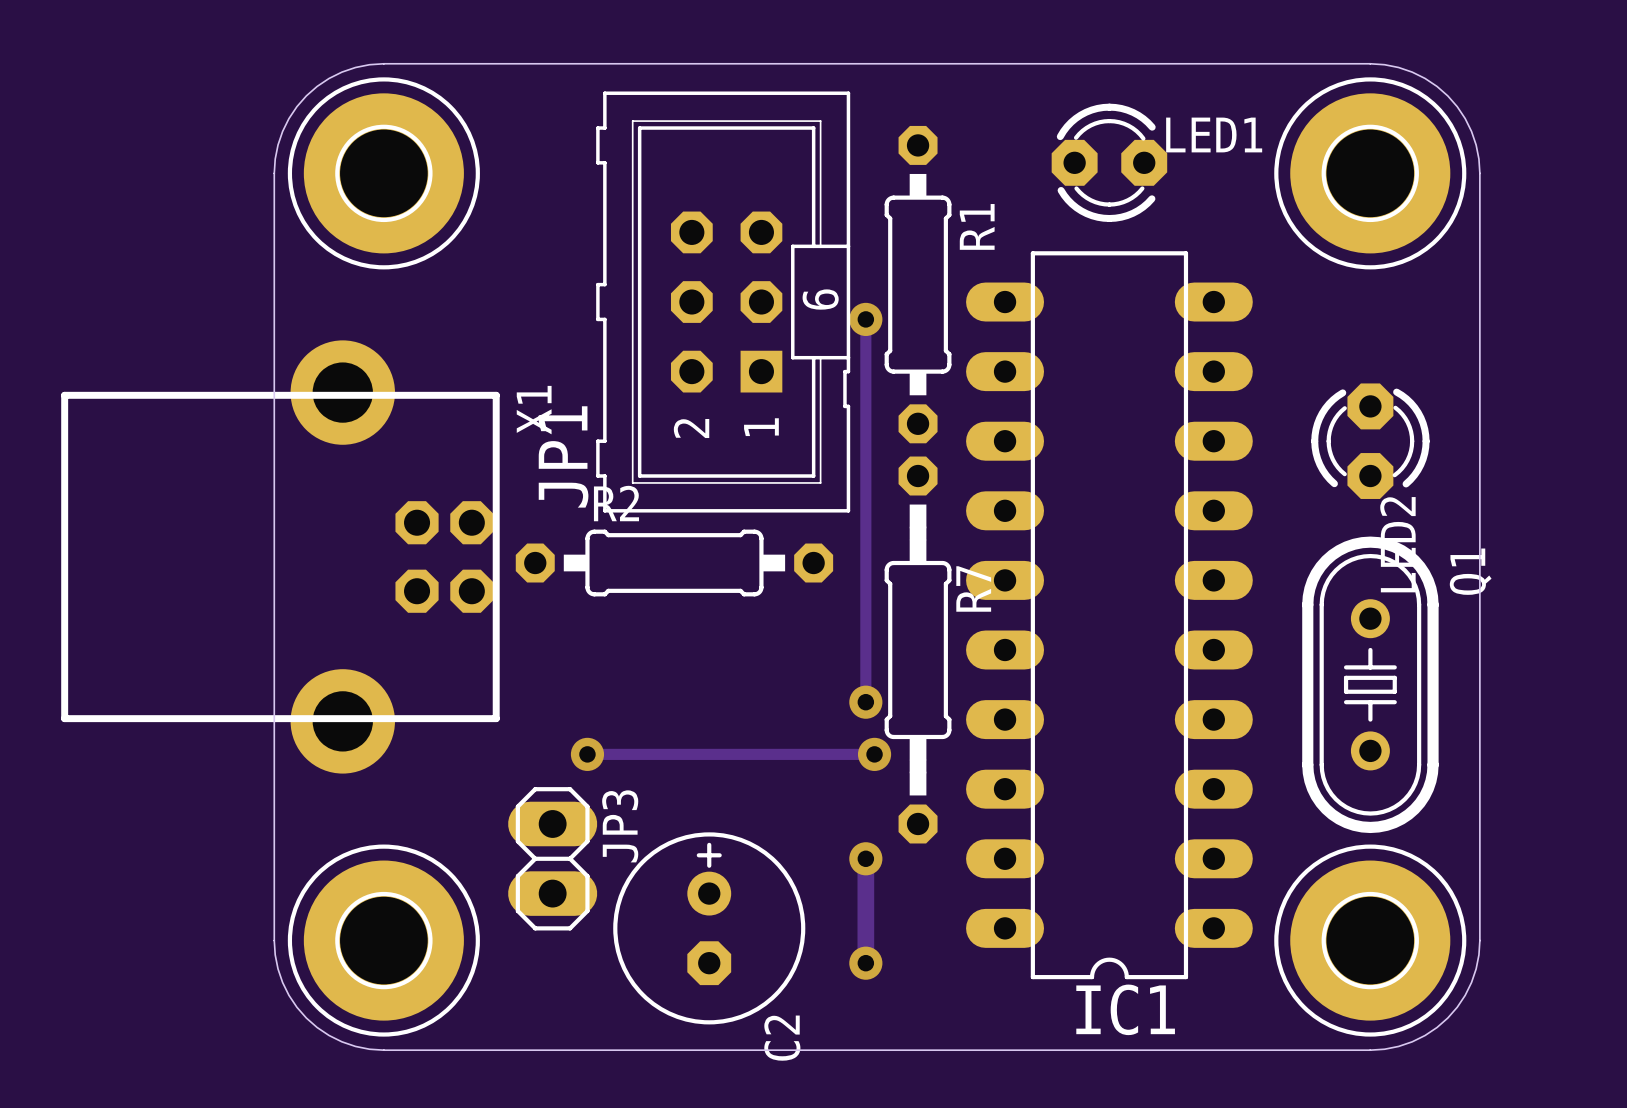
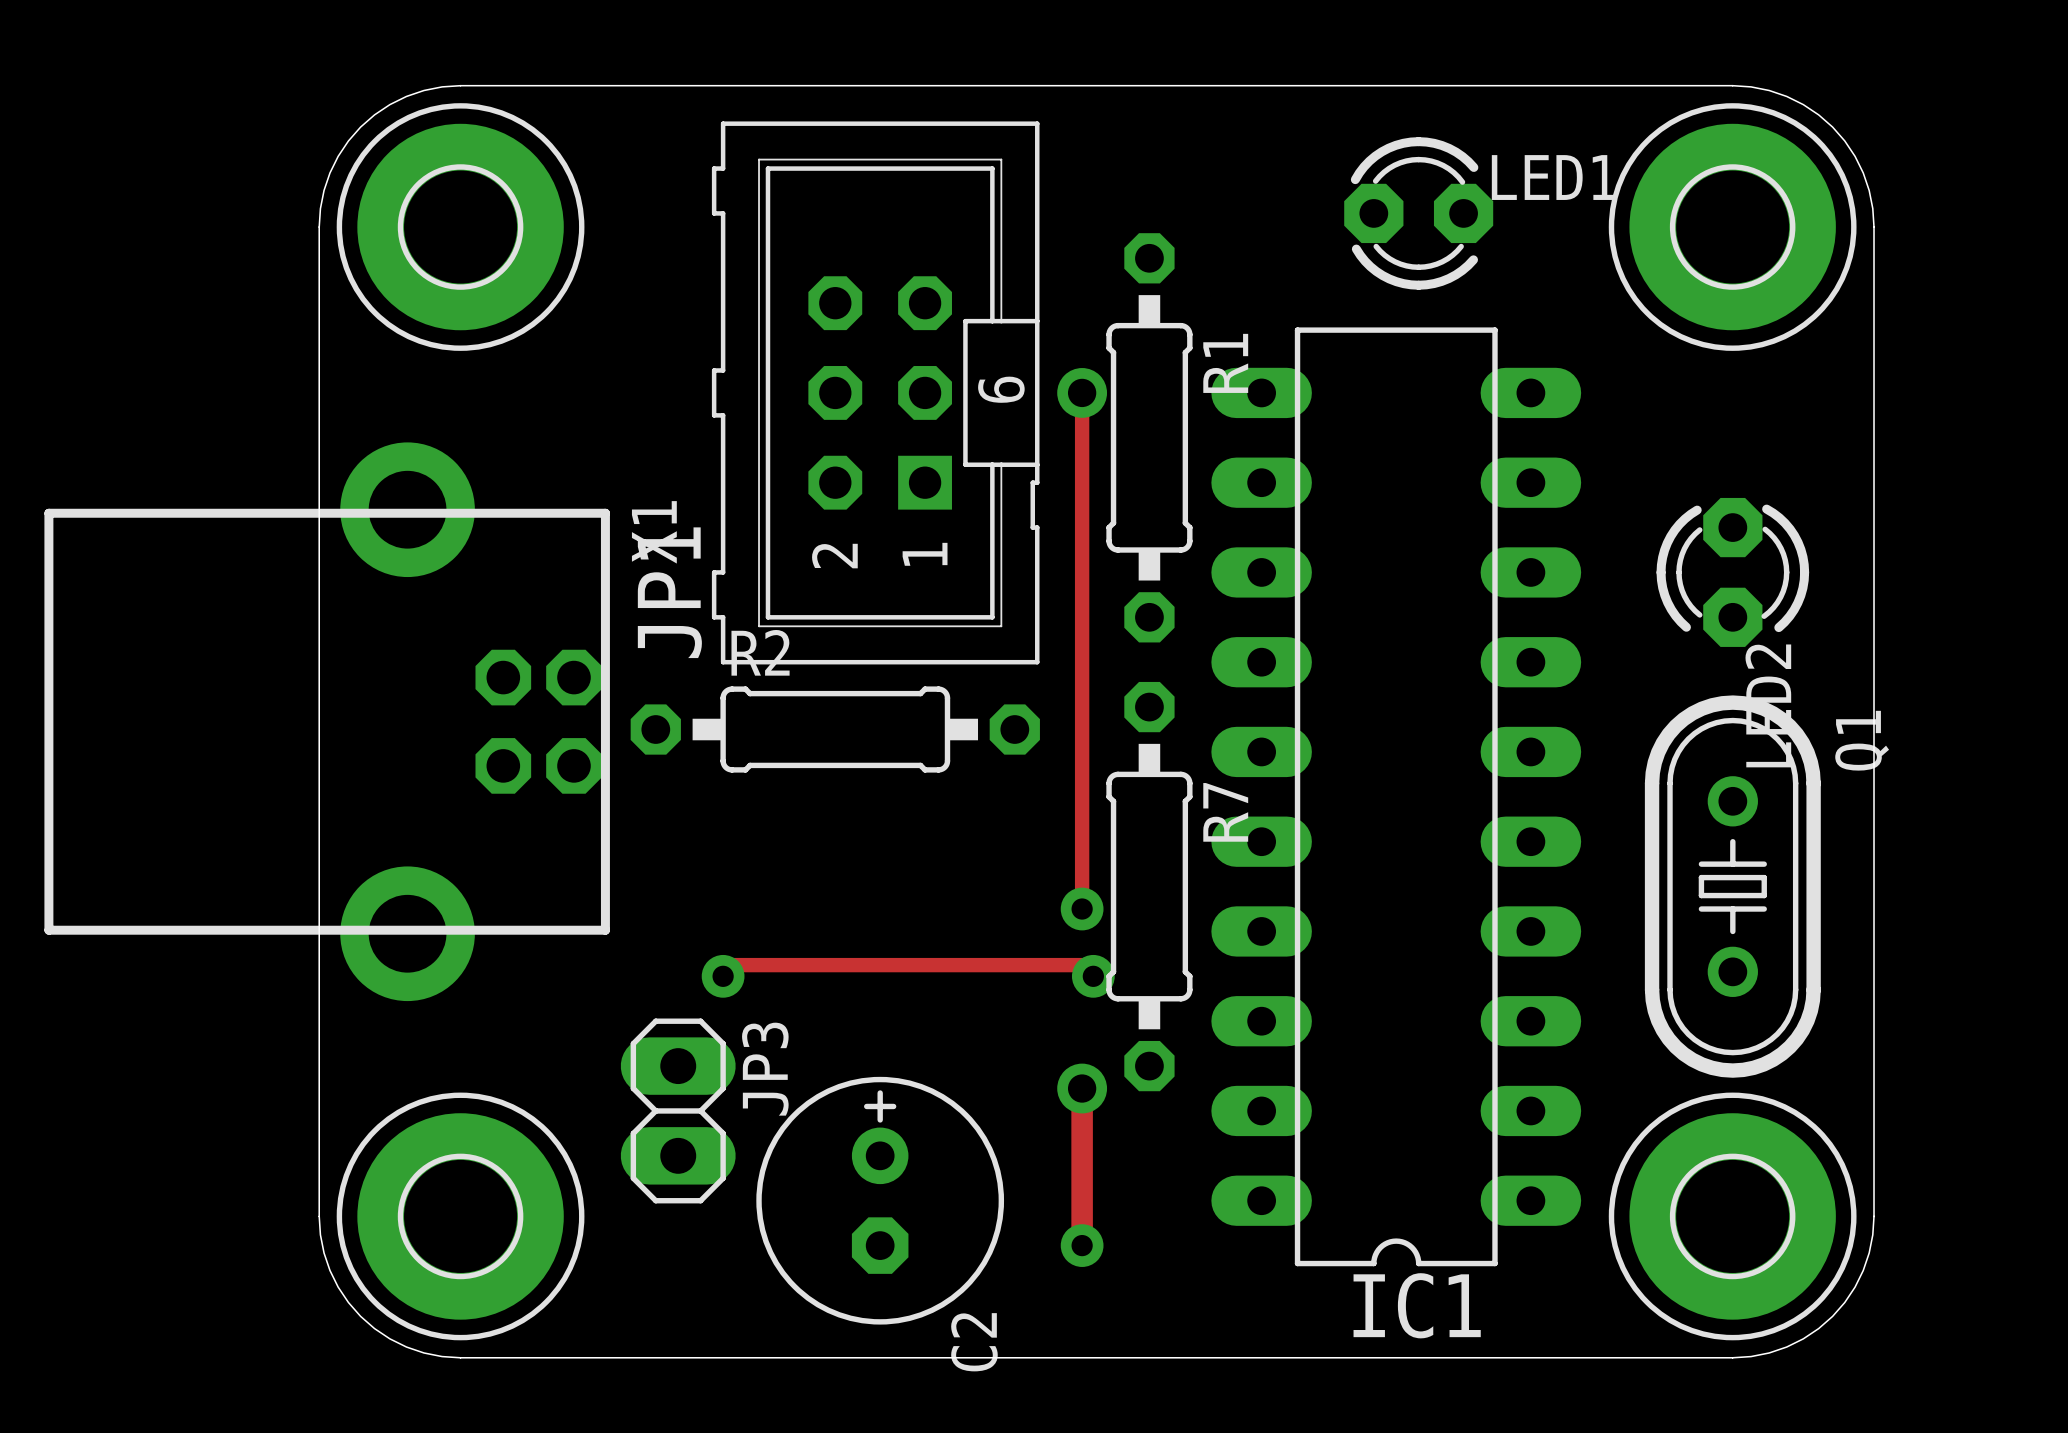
LED1 position: (1109, 162) -> (1418, 213)
R1 position: (918, 284) -> (1149, 437)
JP1 position: (723, 302) -> (875, 392)
via position: (865, 319) -> (1082, 392)
R7 footprint: [884, 456, 952, 844] -> [1106, 681, 1193, 1092]
track: none -> (723, 965) (1082, 965)
track: (587, 754) (874, 754) -> none
via position: (865, 858) -> (1082, 1088)

